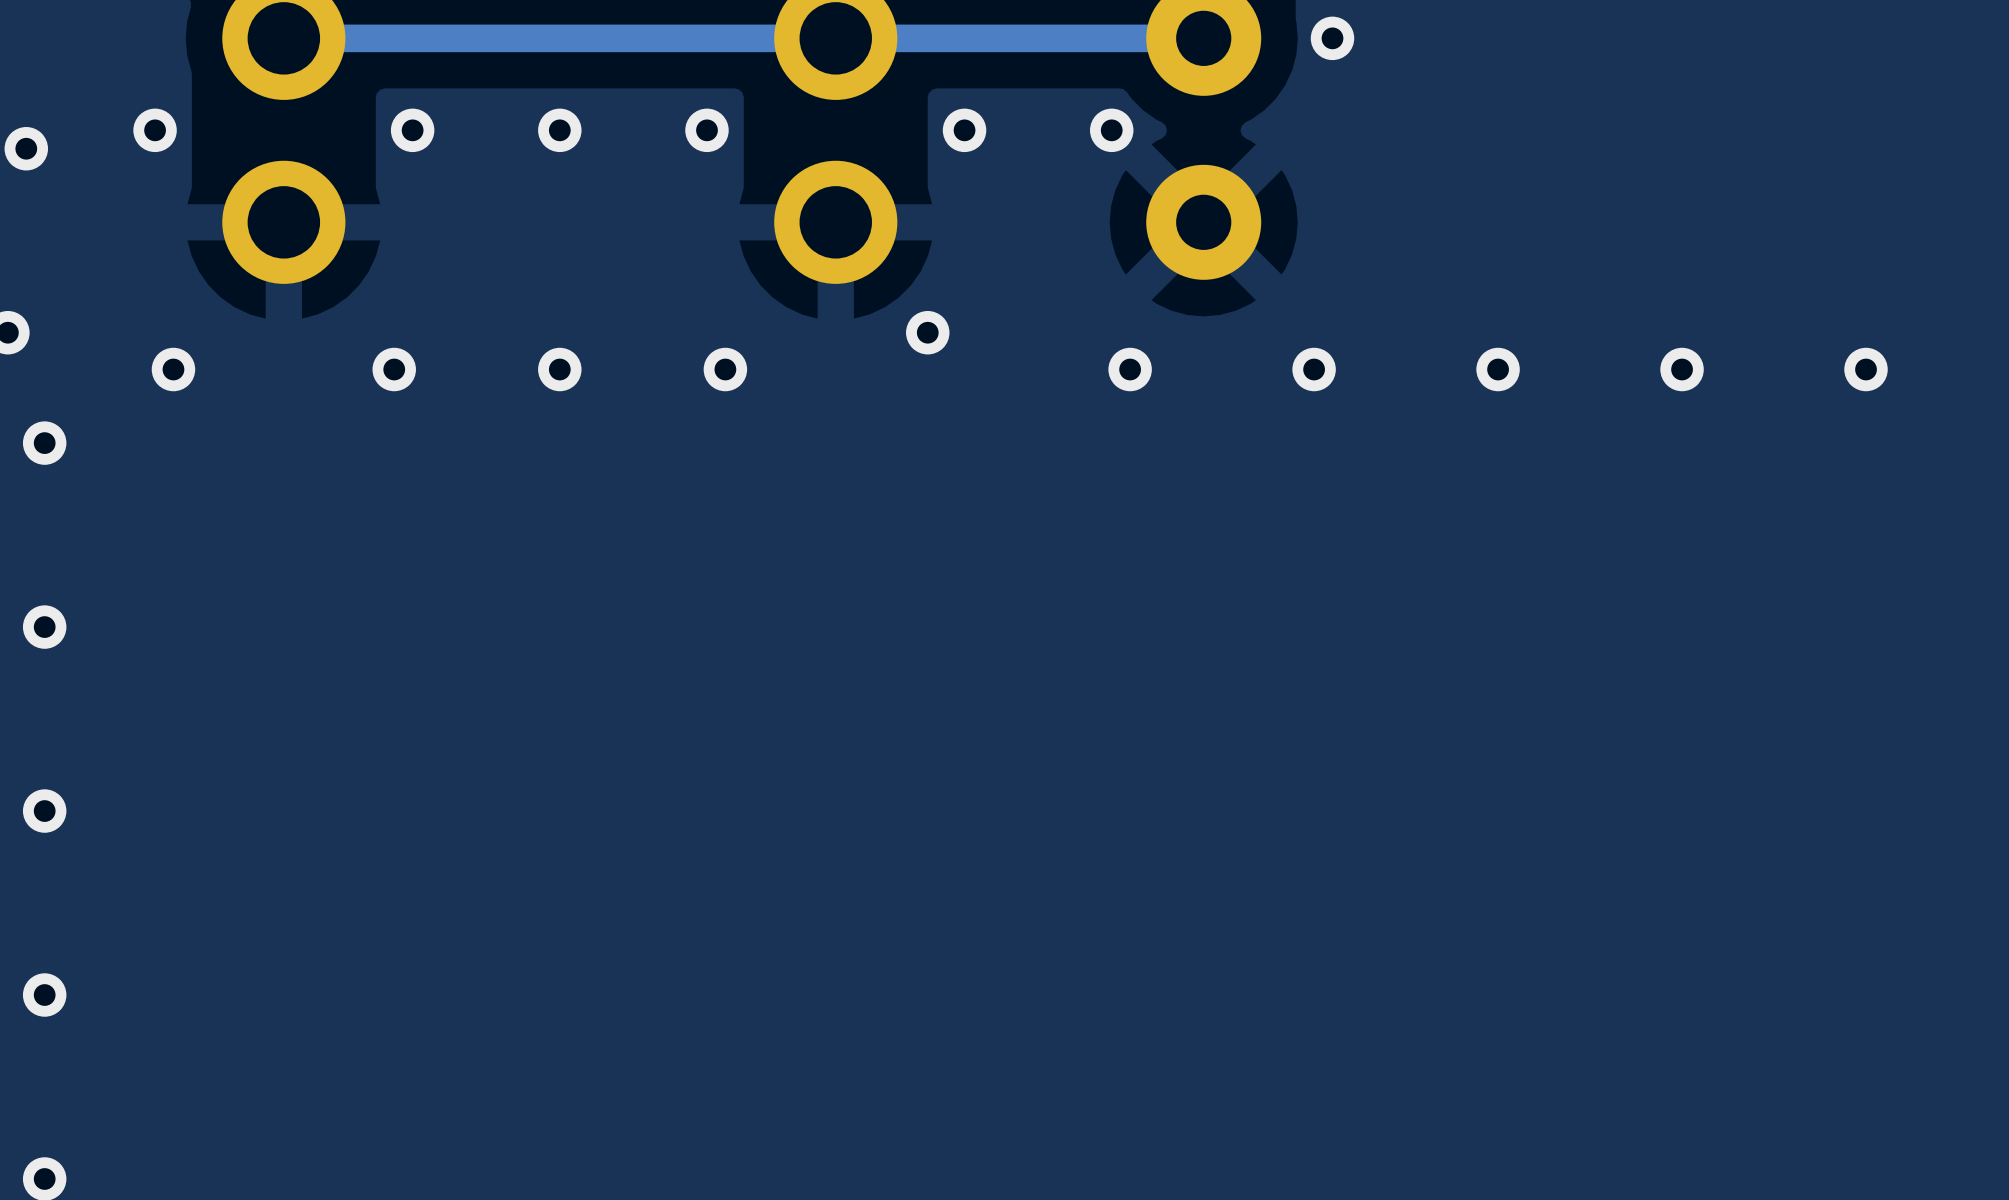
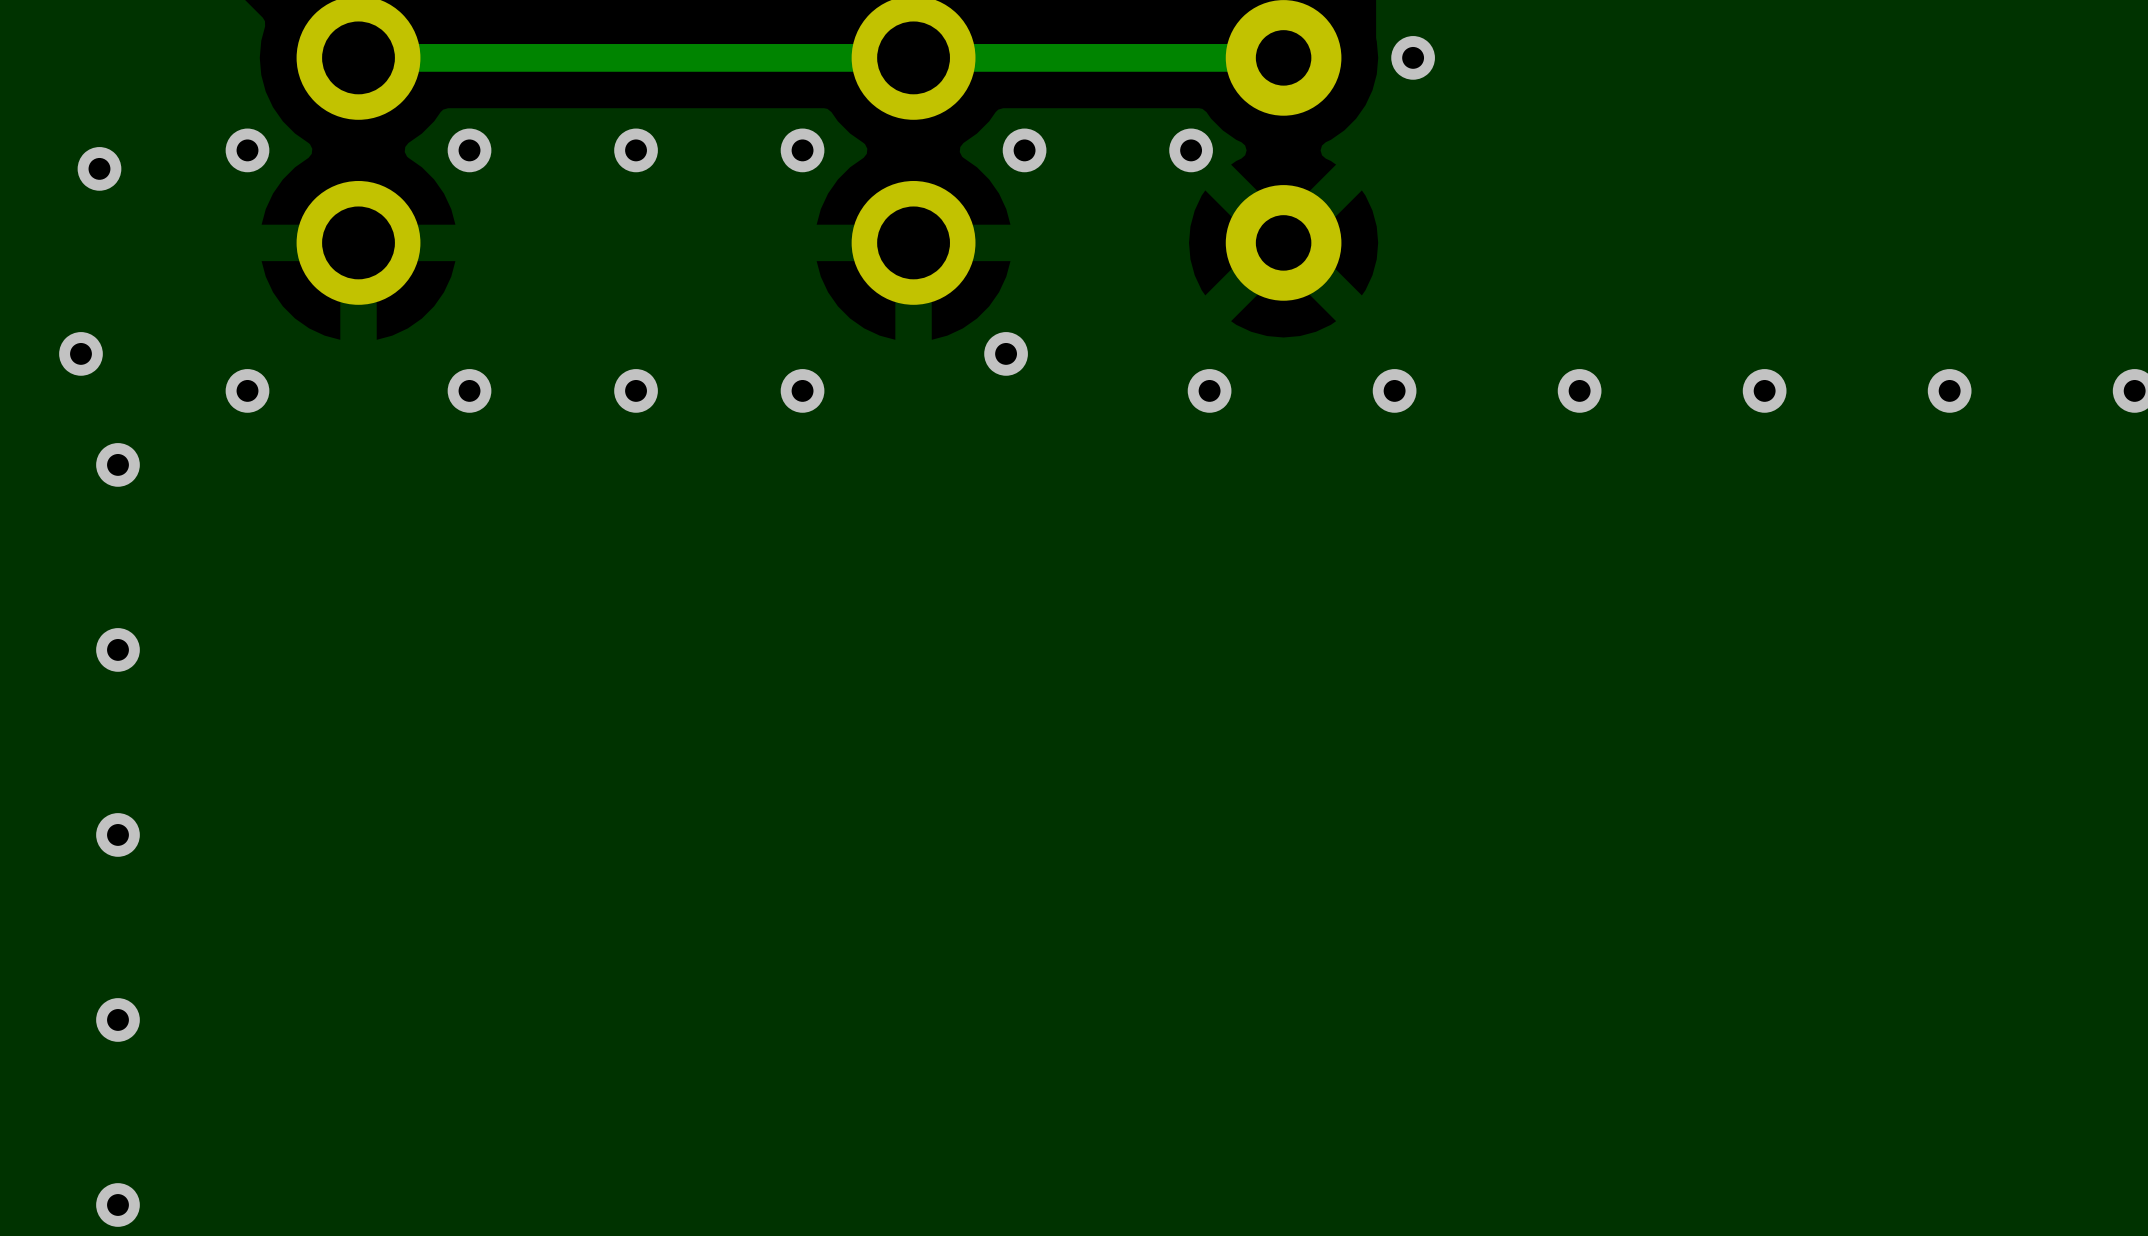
via position: (155, 130) -> (247, 150)
via position: (412, 130) -> (469, 150)
via position: (706, 130) -> (802, 150)
via position: (964, 130) -> (1024, 150)

